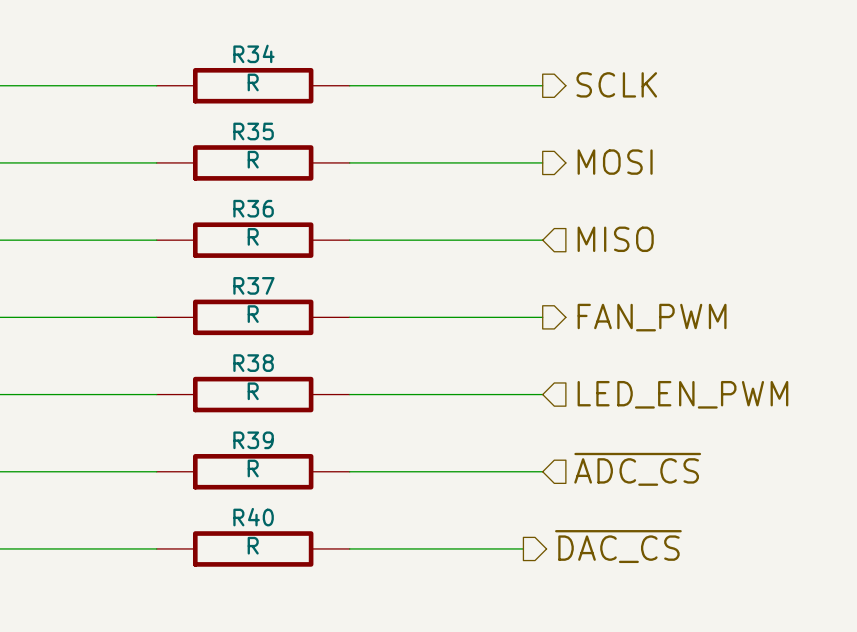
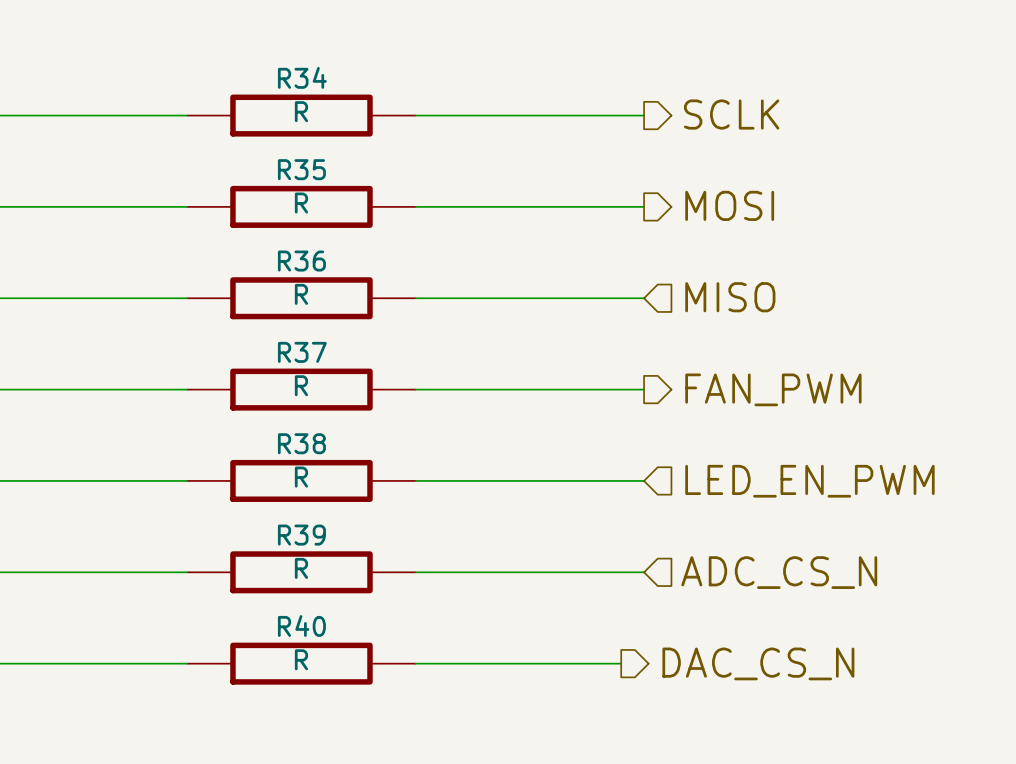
hierarchical label: ~{ADC_CS} (637, 469) -> ADC_CS_N (779, 572)
hierarchical label: ~{DAC_CS} (618, 546) -> DAC_CS_N (758, 663)

